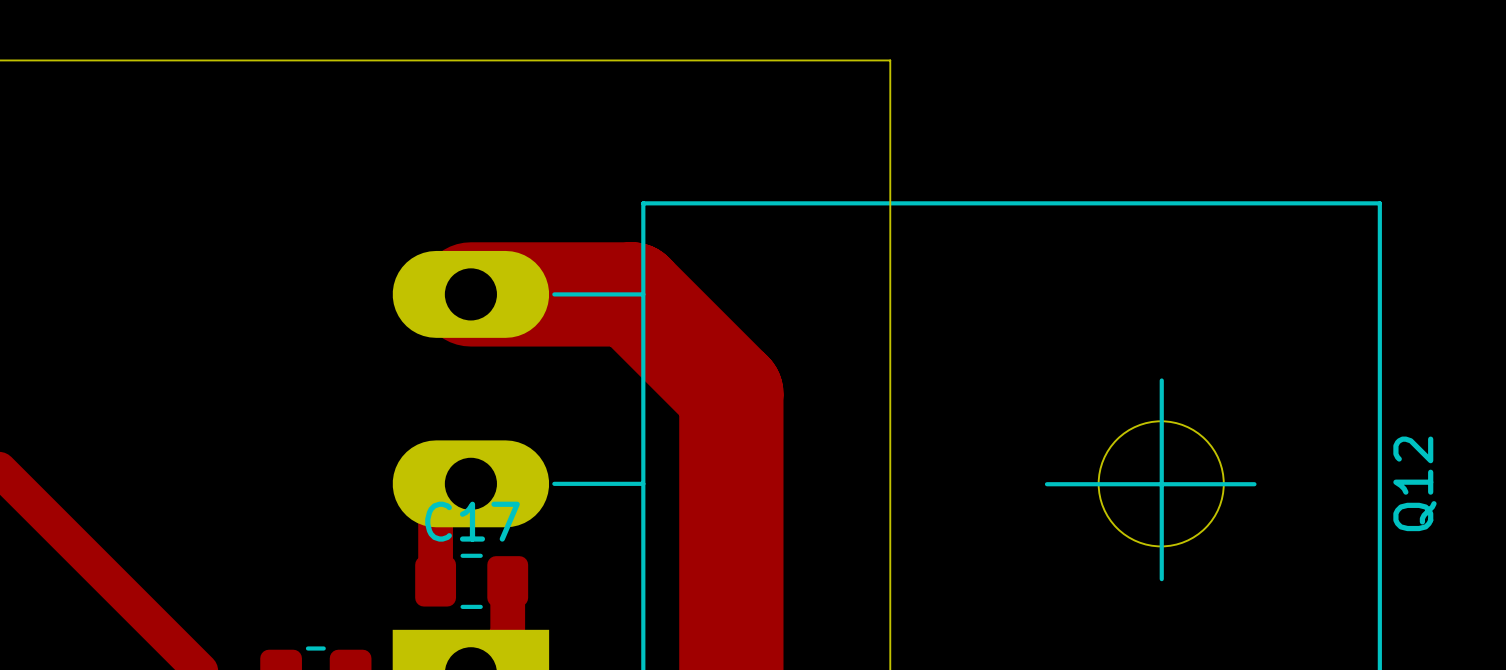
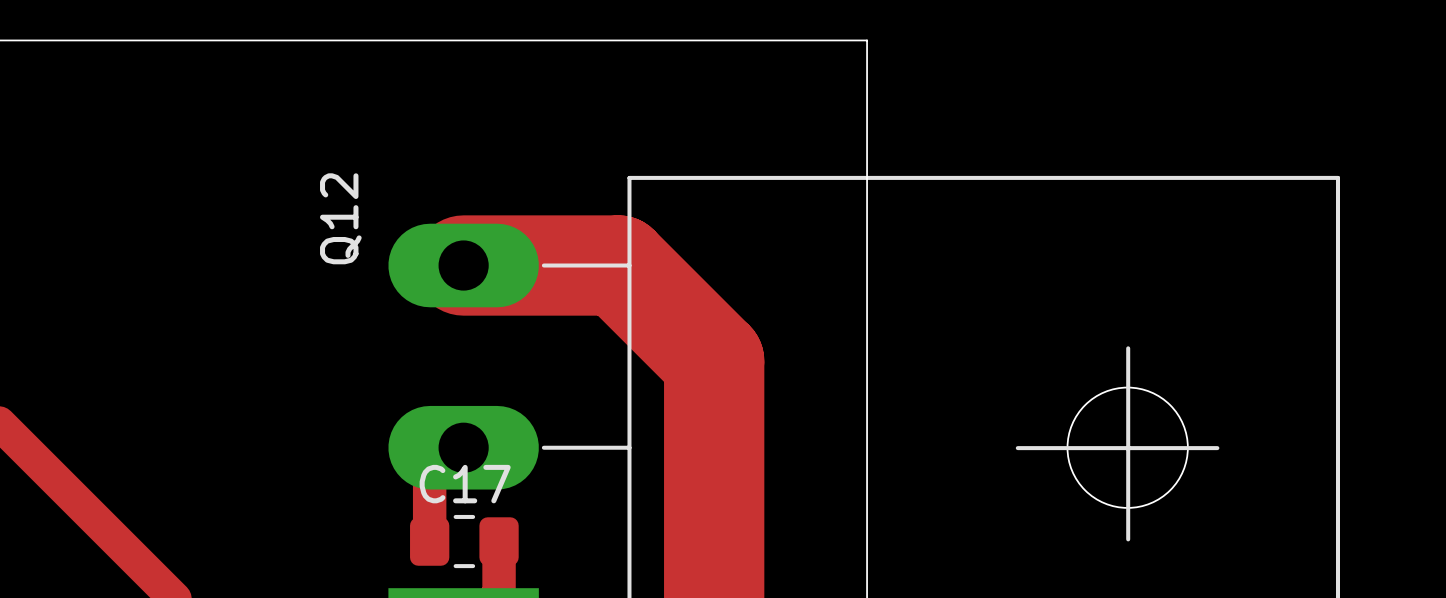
Q12 name position: Q12 (1414, 483) -> Q12 (340, 218)

